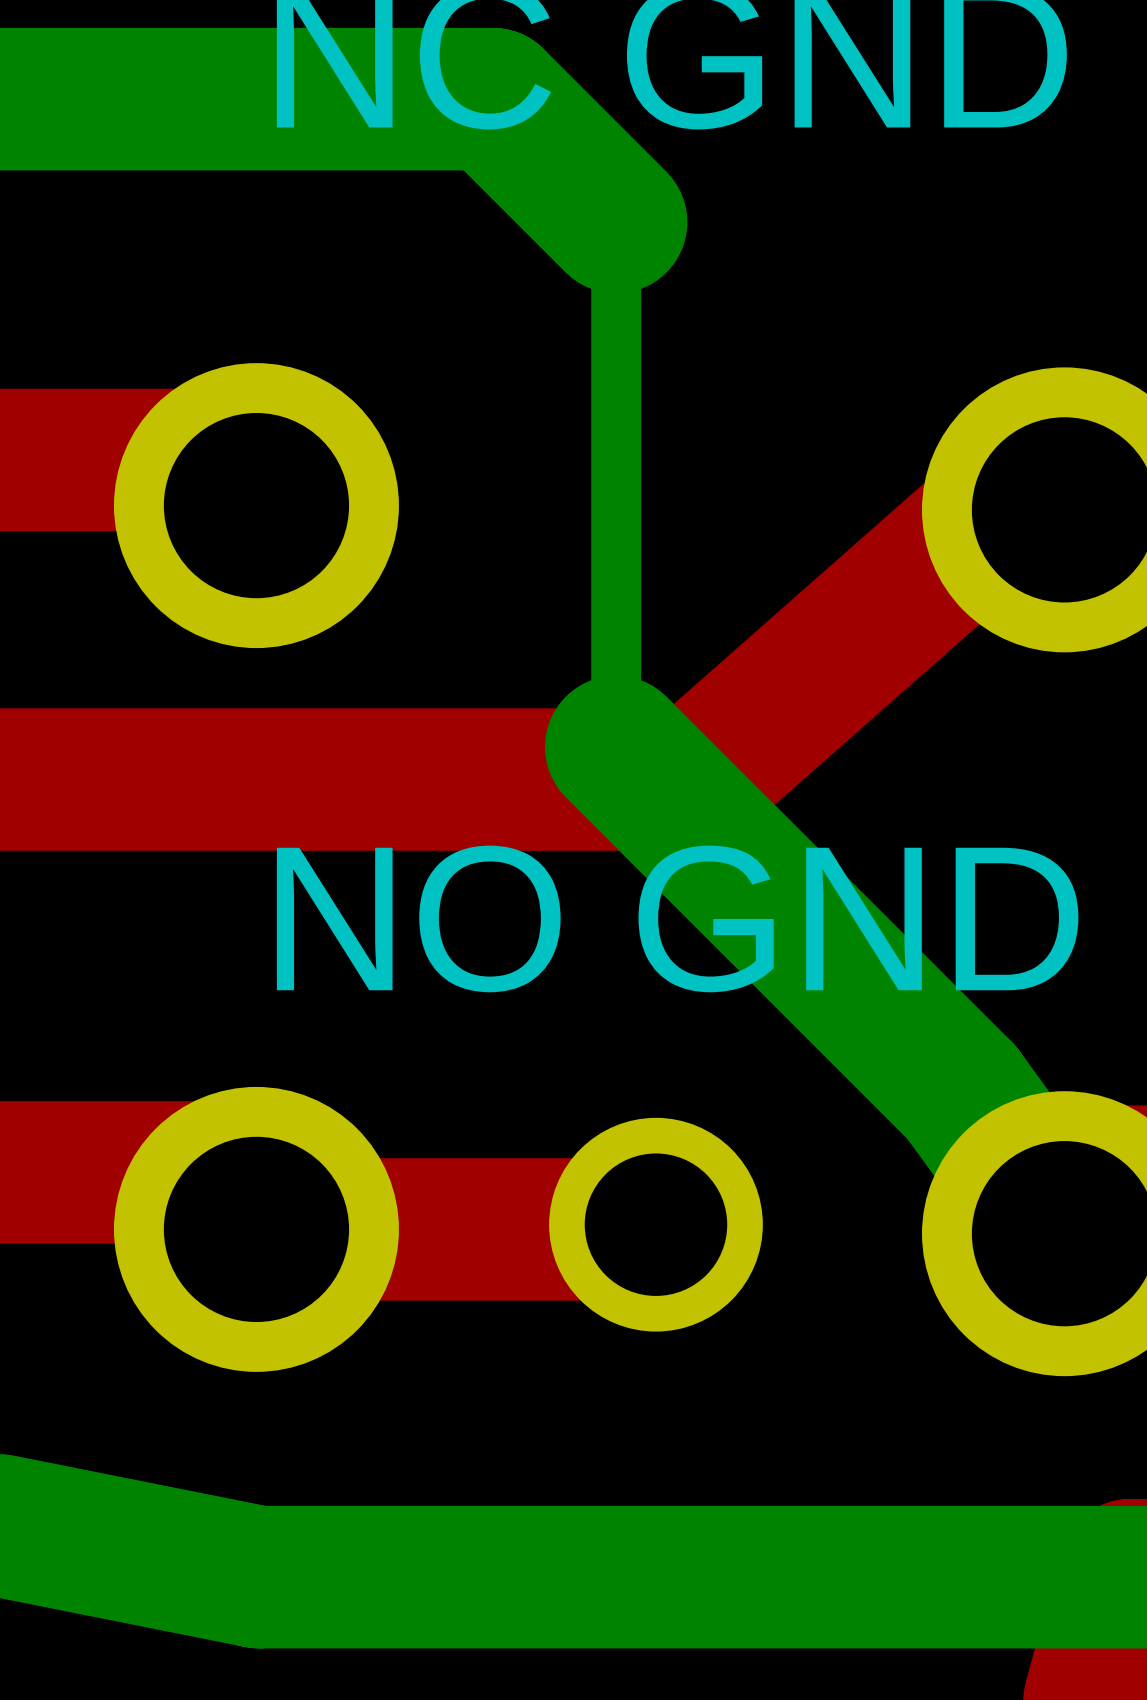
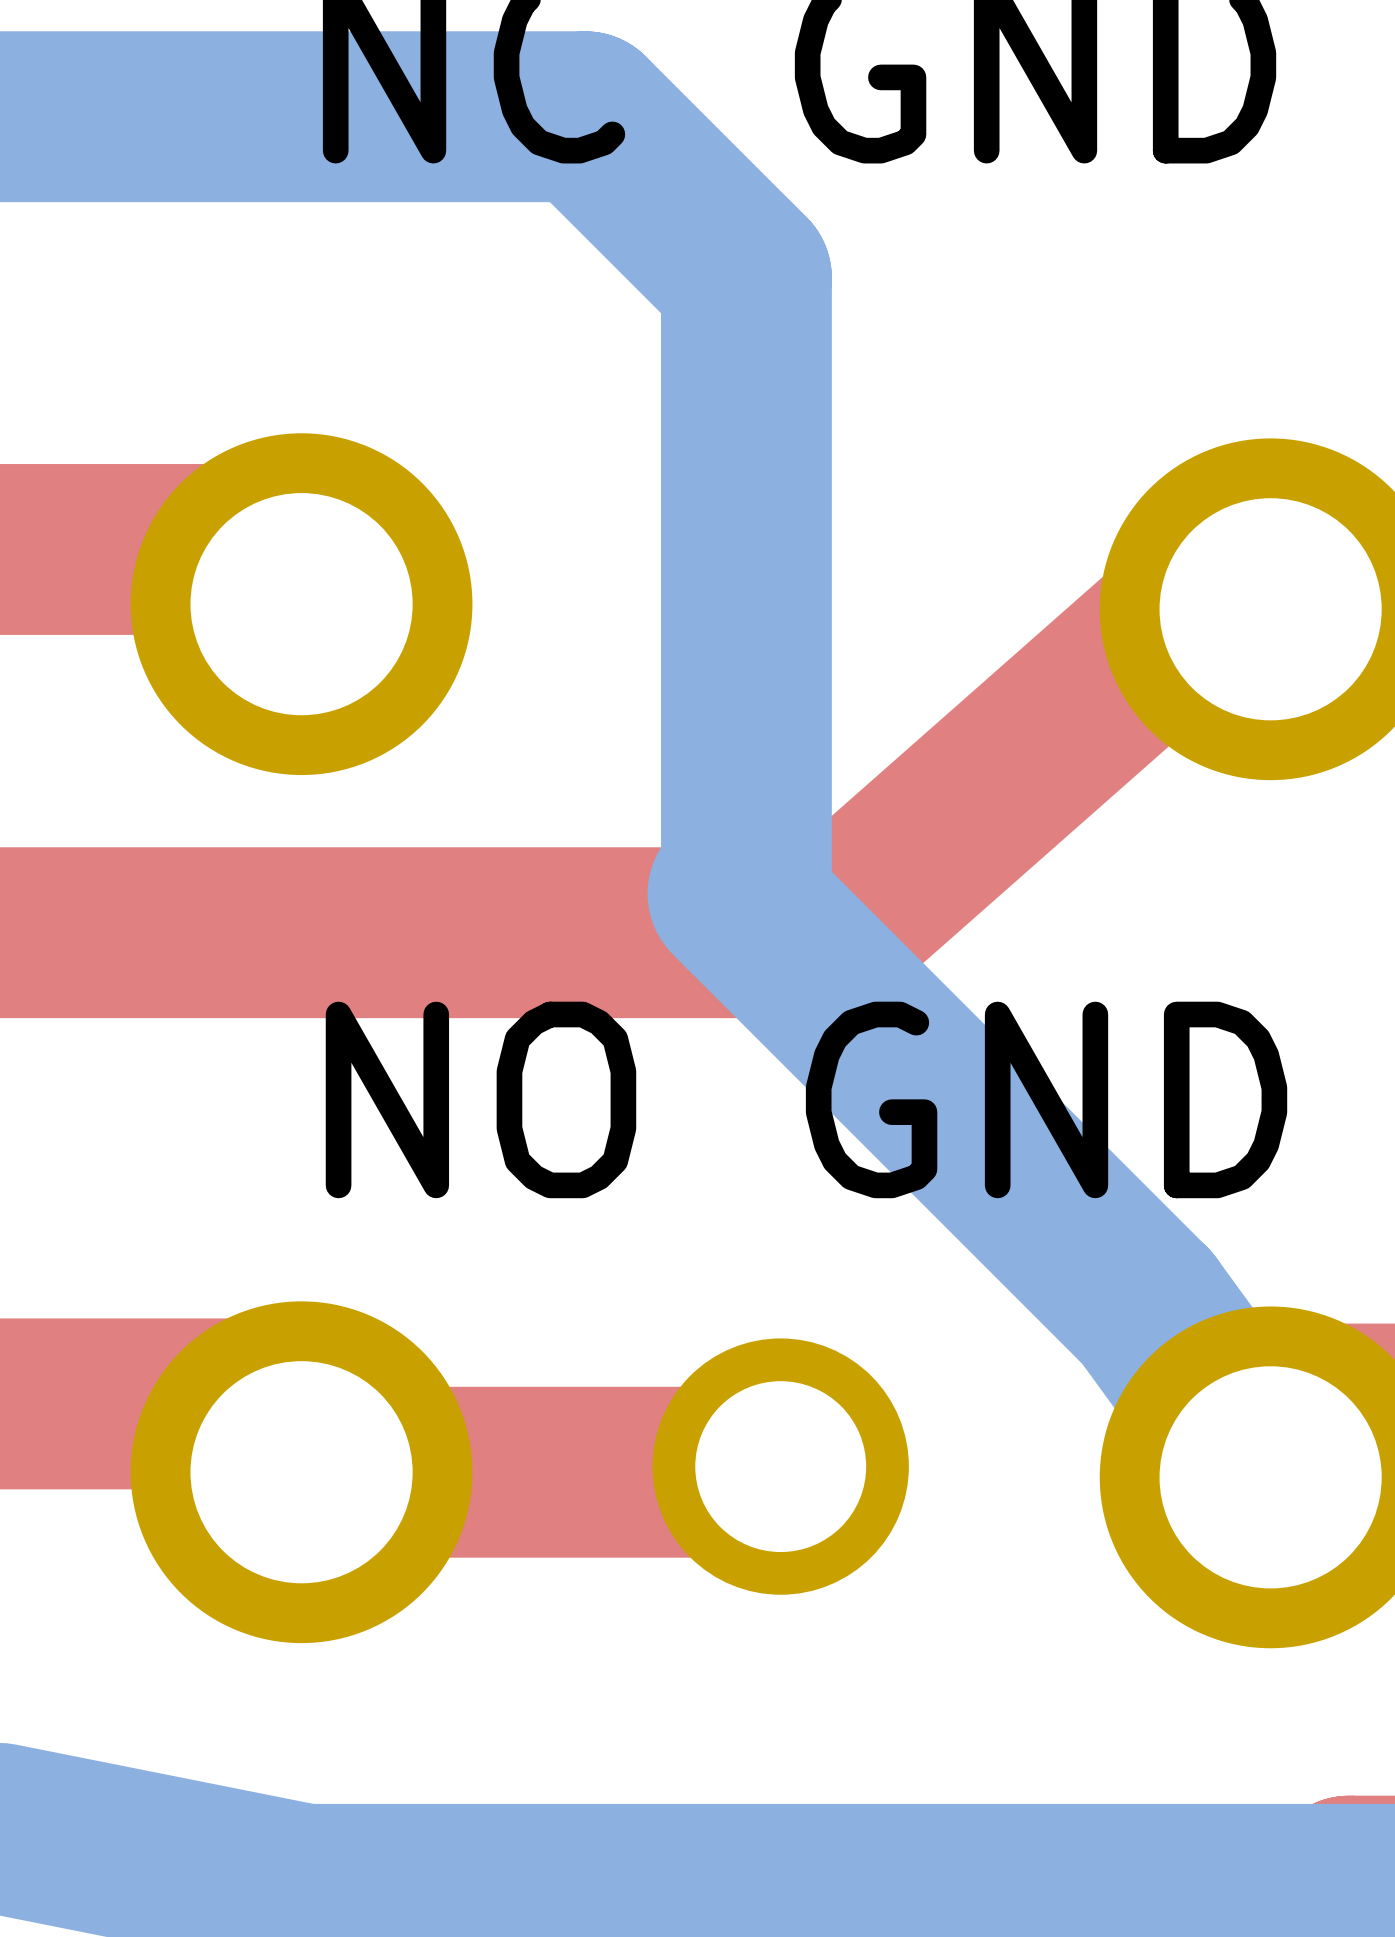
bottom track: (616, 222) (616, 746) -> (732, 264) (746, 277) (746, 907)

